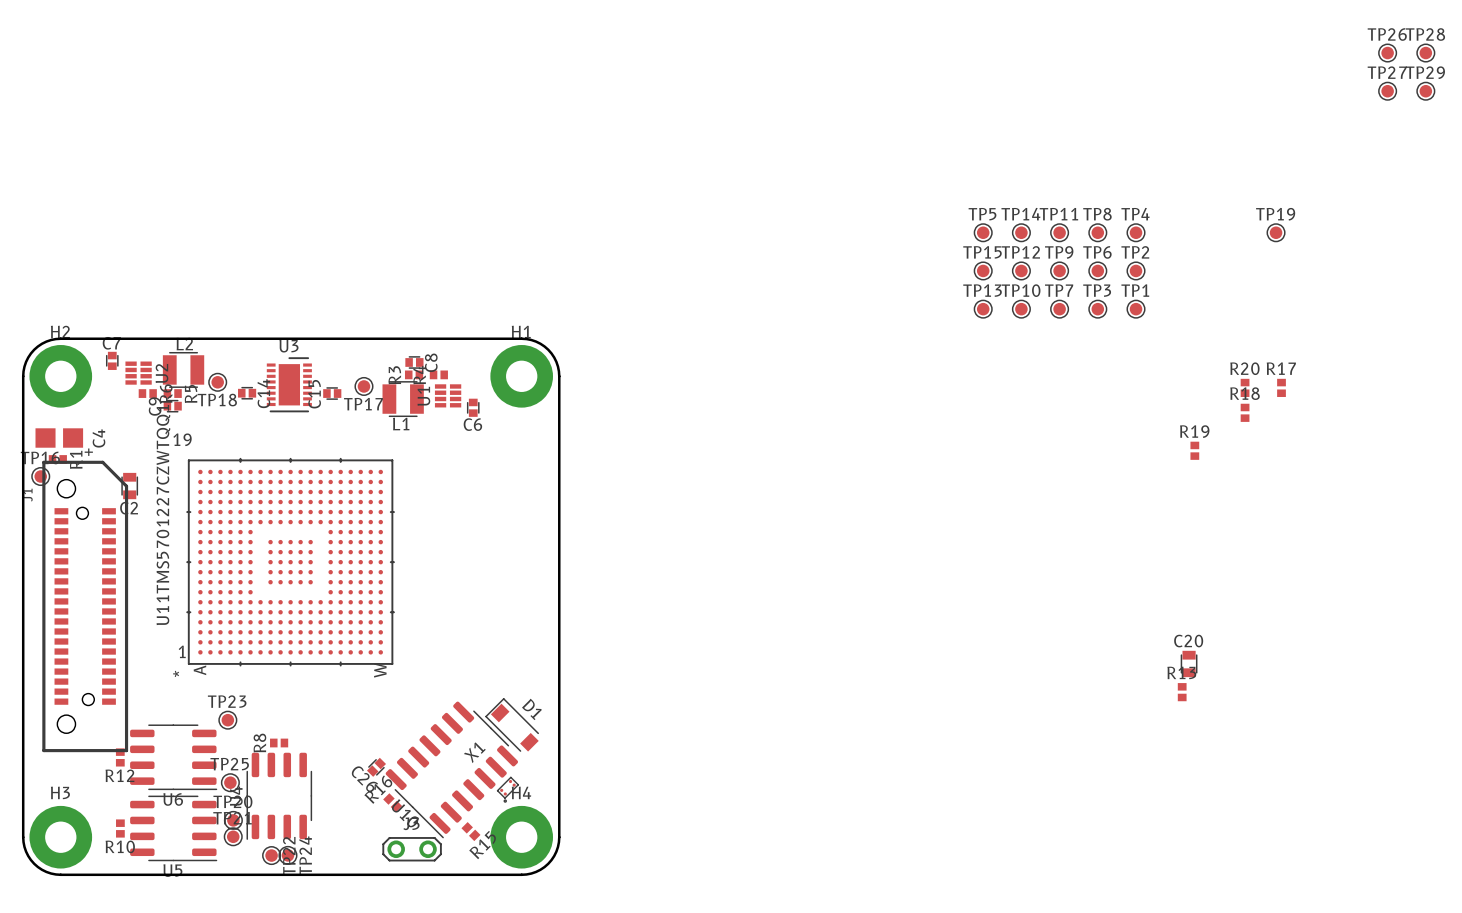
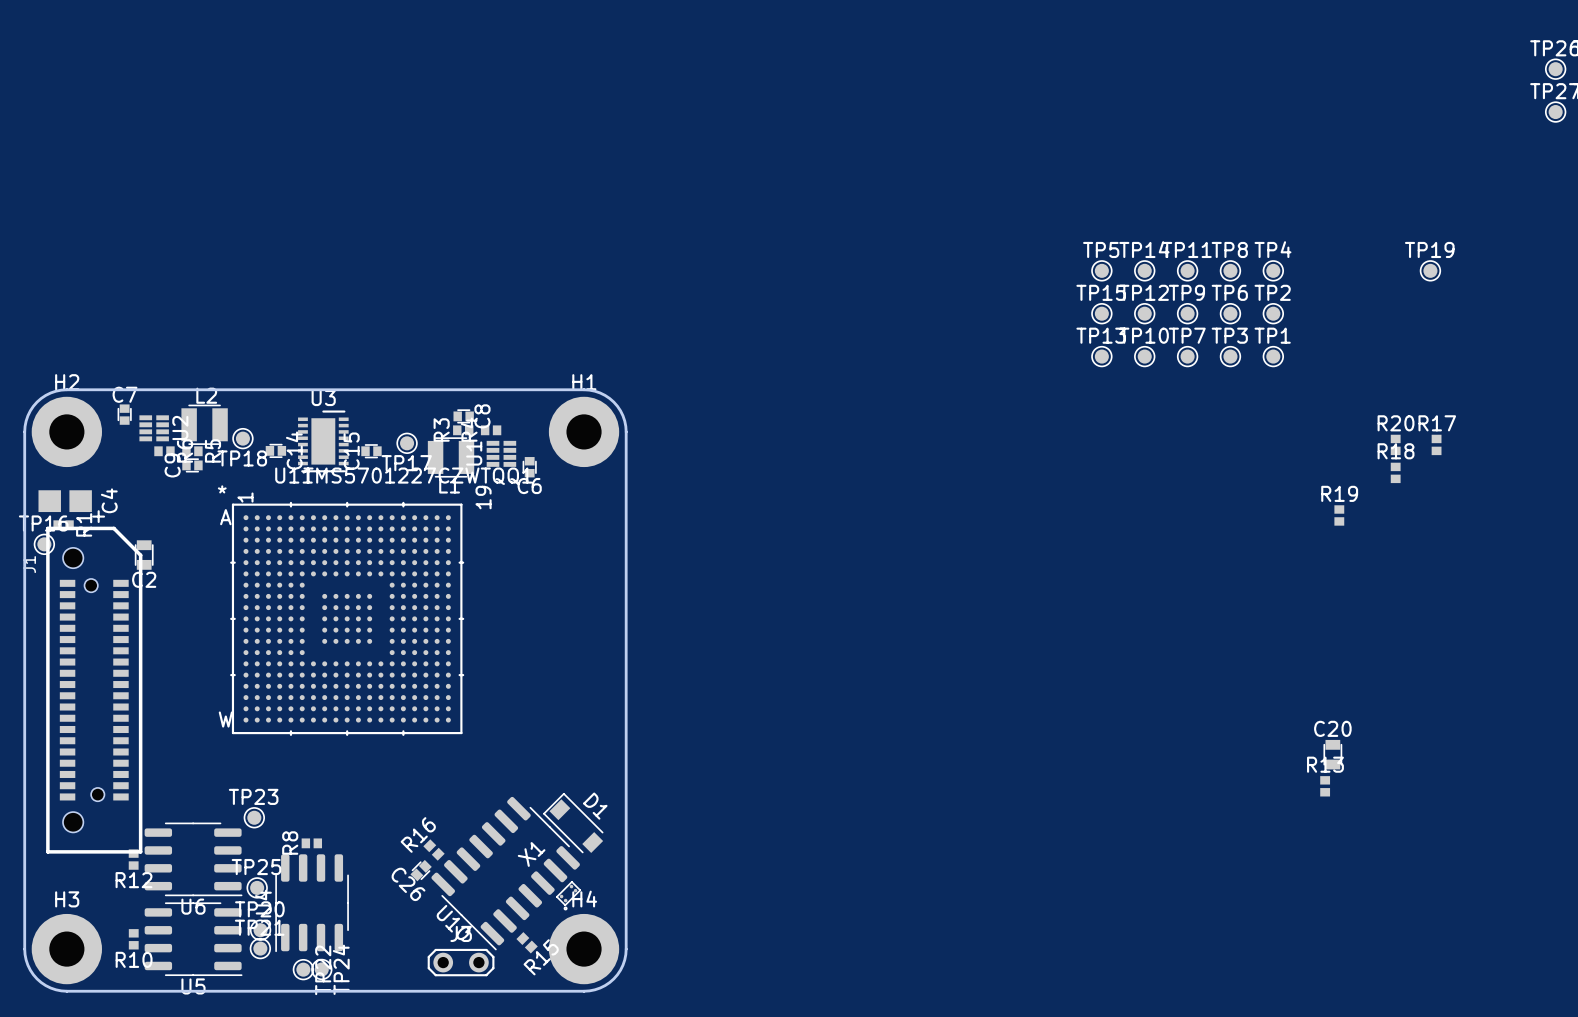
U11 rotation: 0° (290, 562) -> 90° clockwise (347, 618)
R16 position: (392, 802) -> (434, 850)

